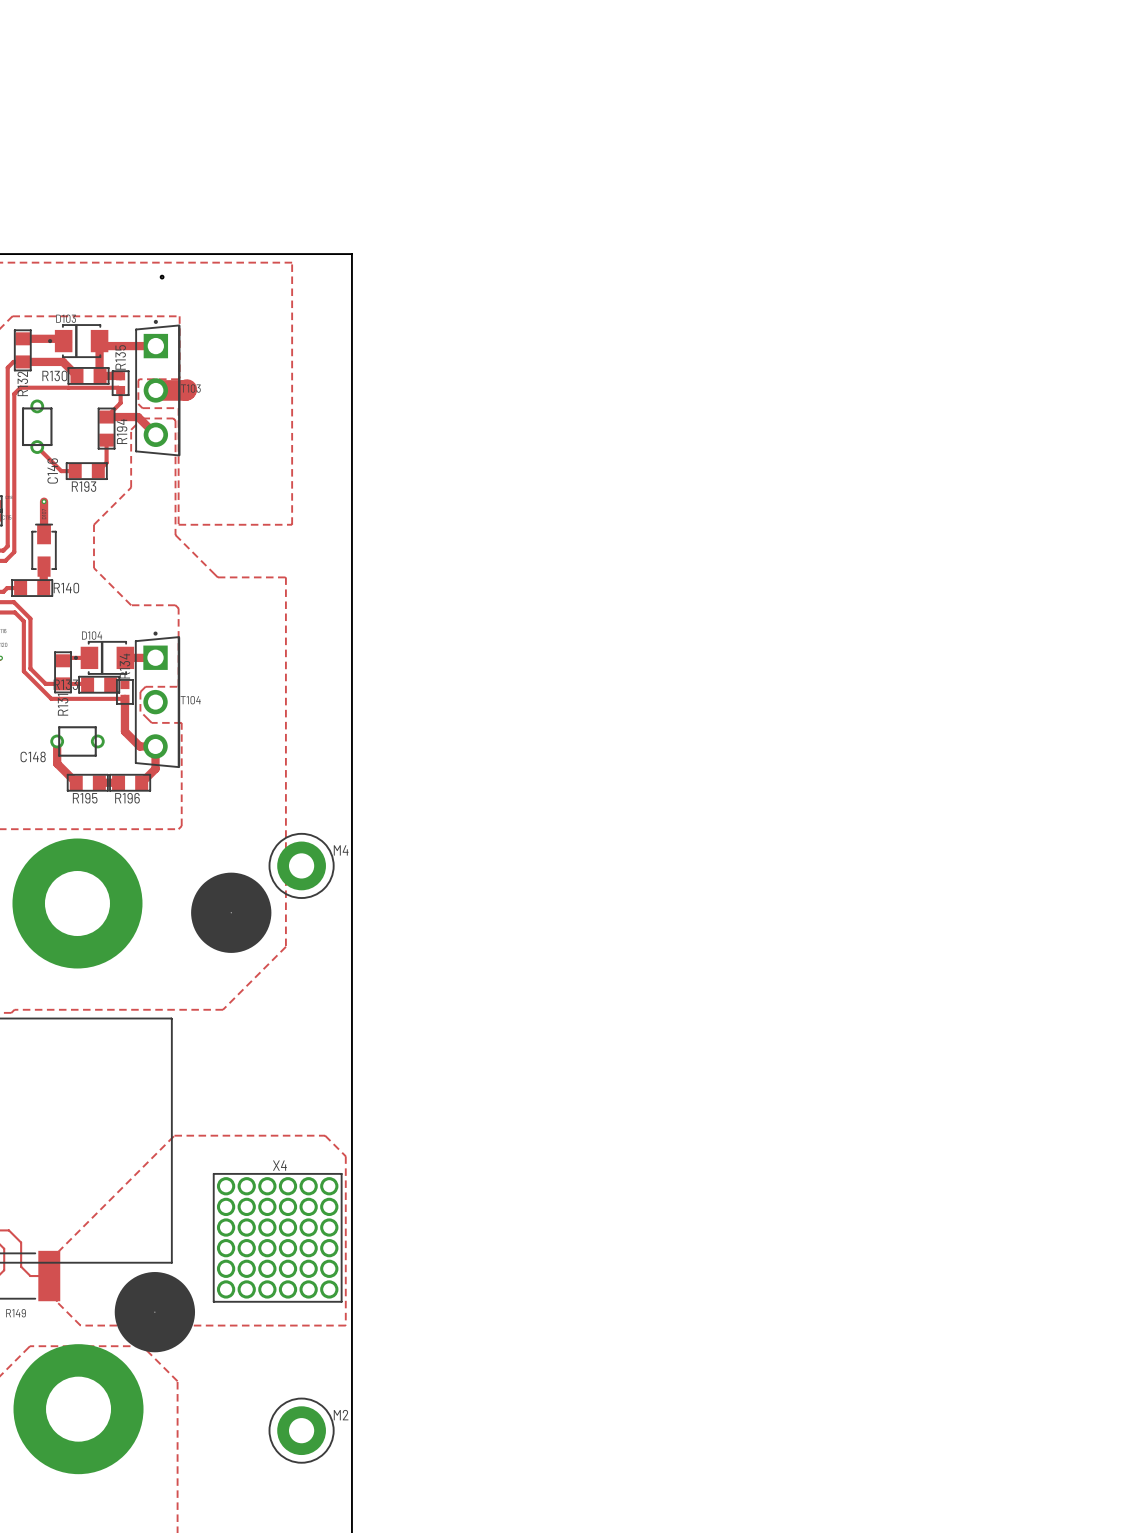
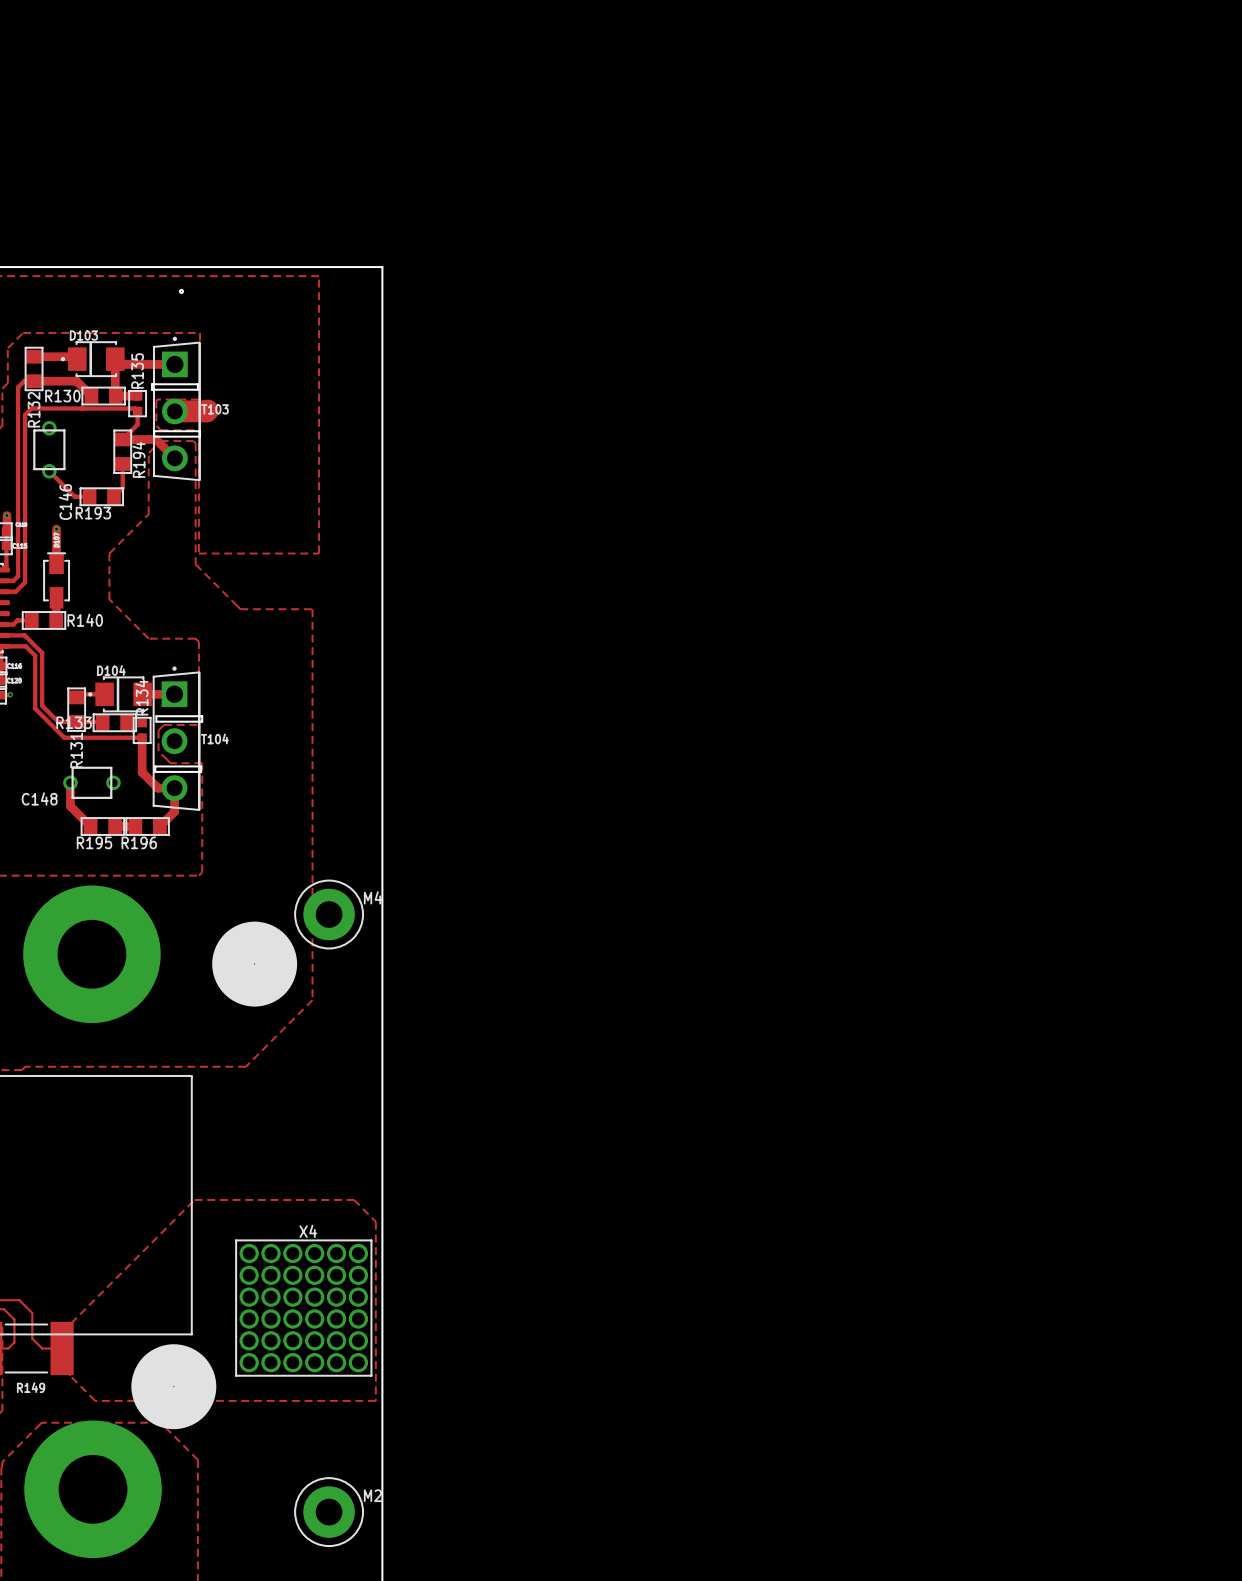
board edge: none -> (152, 384) (152, 389) (197, 389) (197, 384) (152, 384)
board edge: none -> (154, 431) (154, 436) (200, 436) (200, 431) (154, 431)
board edge: none -> (156, 716) (156, 721) (202, 721) (202, 716) (156, 716)
board edge: none -> (155, 766) (155, 771) (201, 771) (201, 766) (155, 766)

